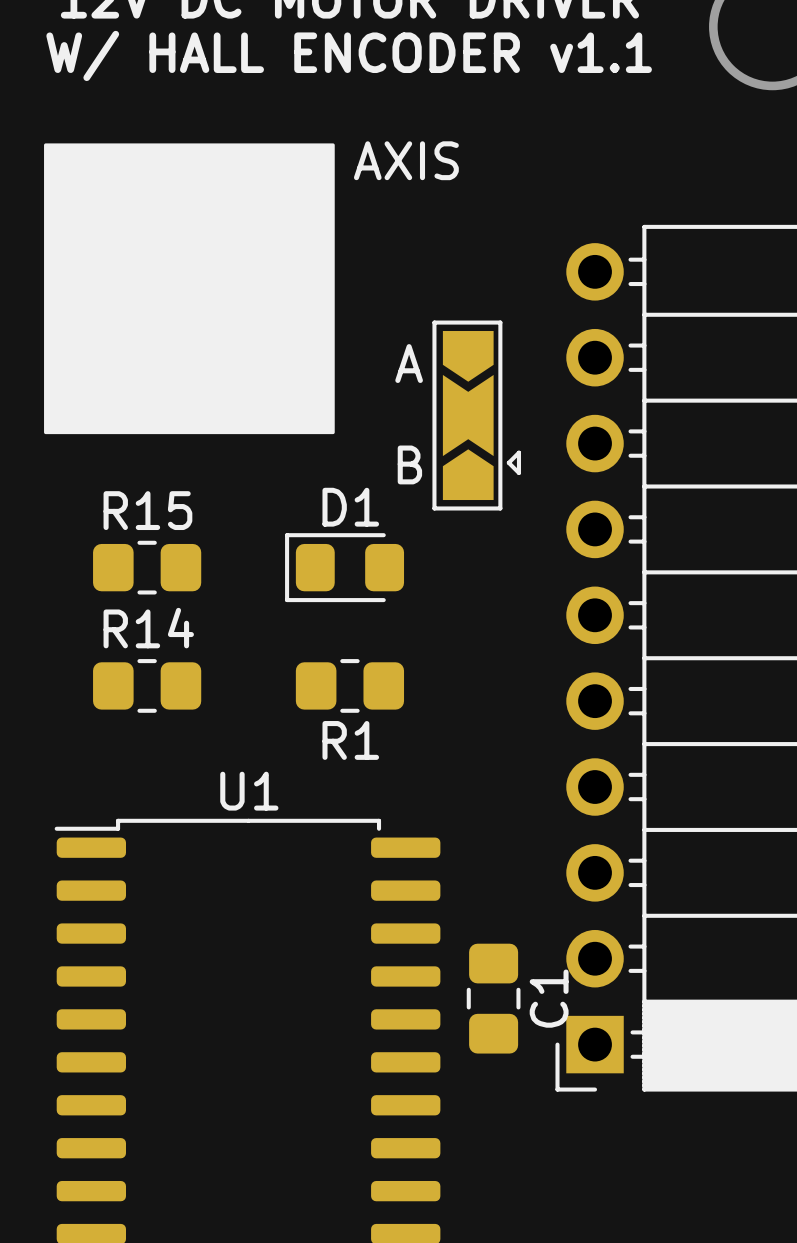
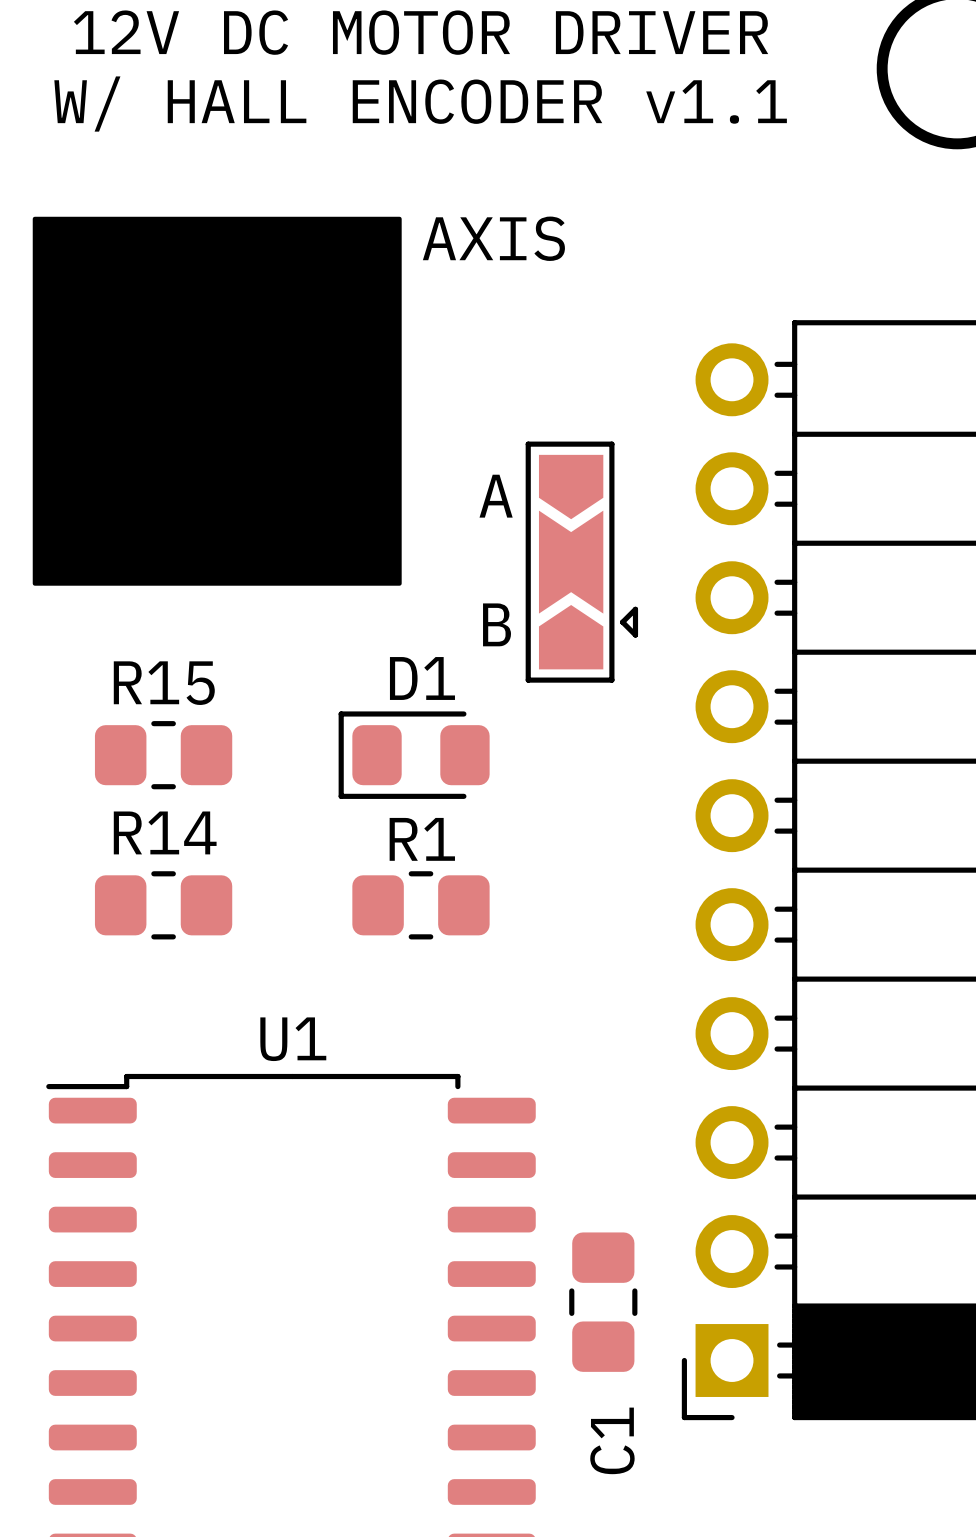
R1 name position: R1 (350, 740) -> R1 (422, 839)
C1 name position: C1 (549, 998) -> C1 (612, 1440)

